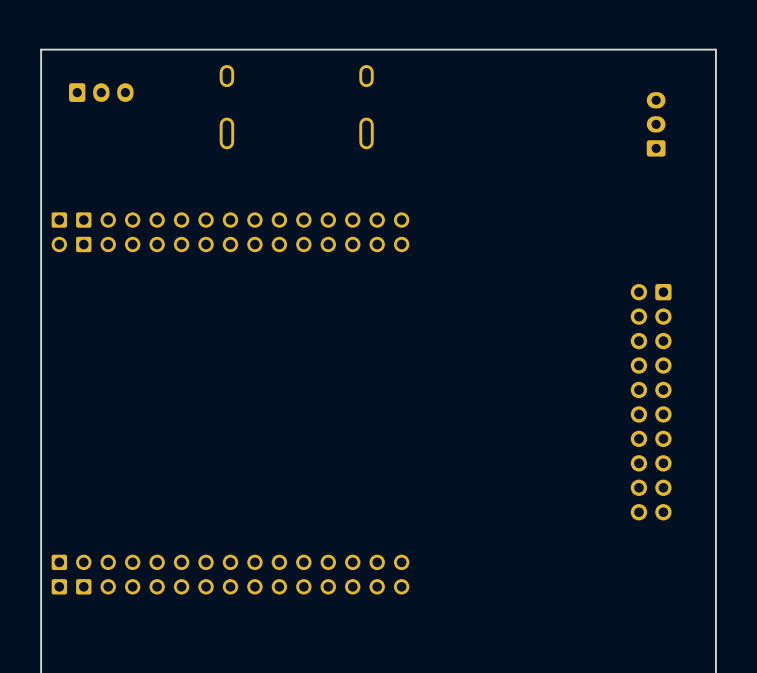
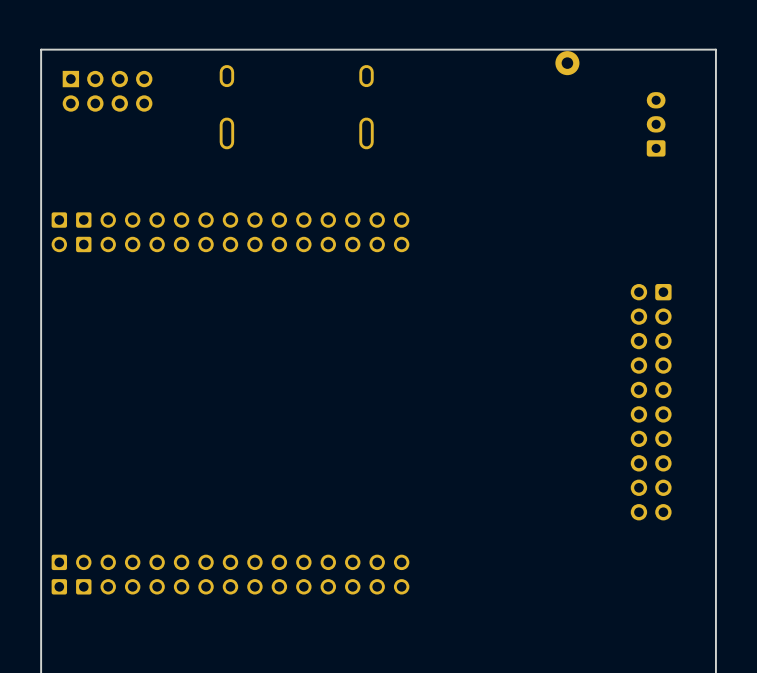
part: none -> (567, 63)
part footprint: [69, 83, 134, 102] -> [62, 70, 153, 112]

